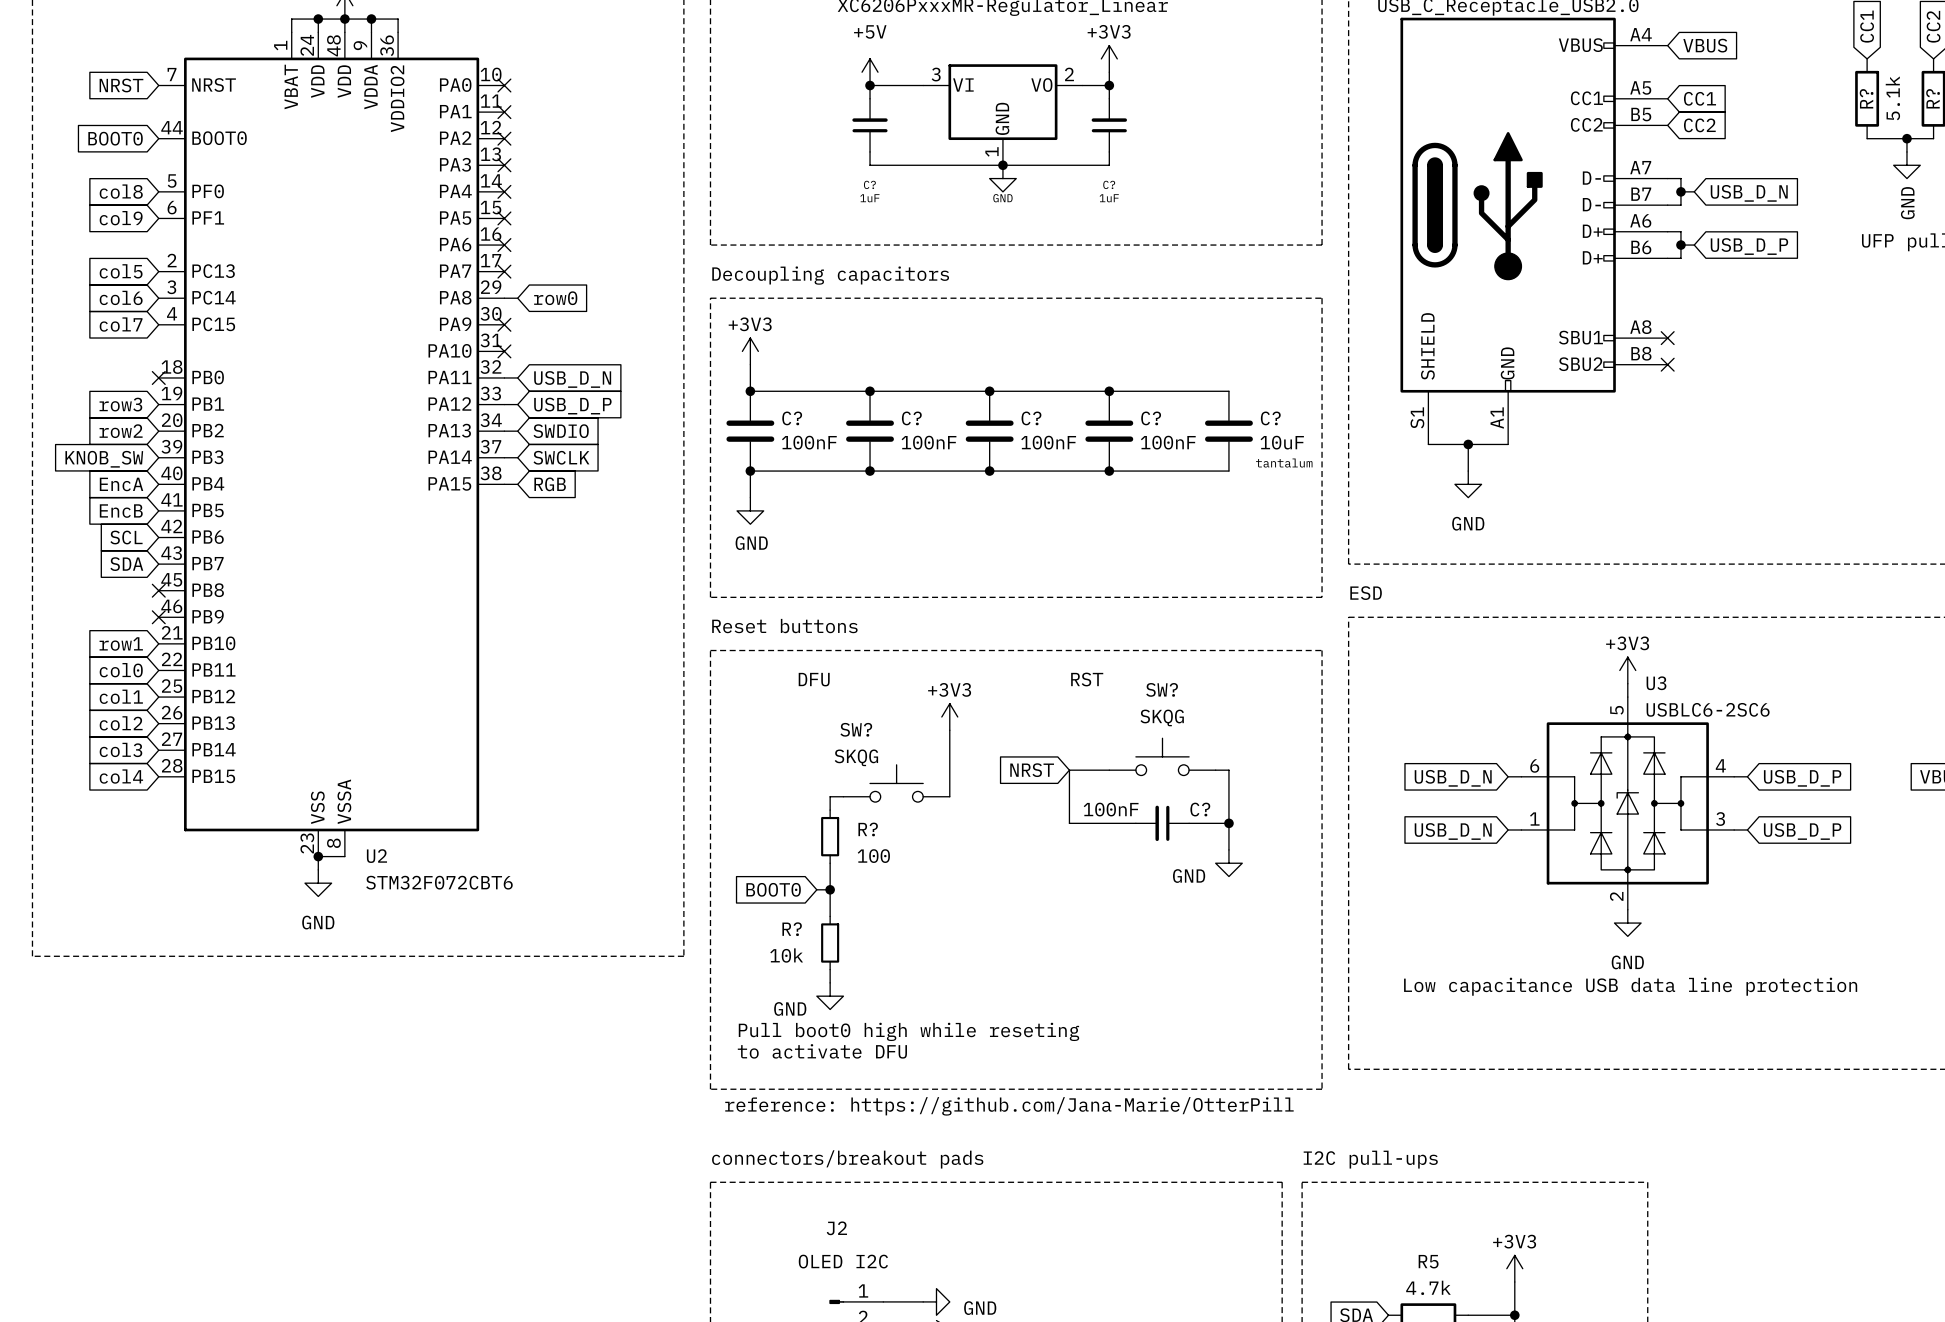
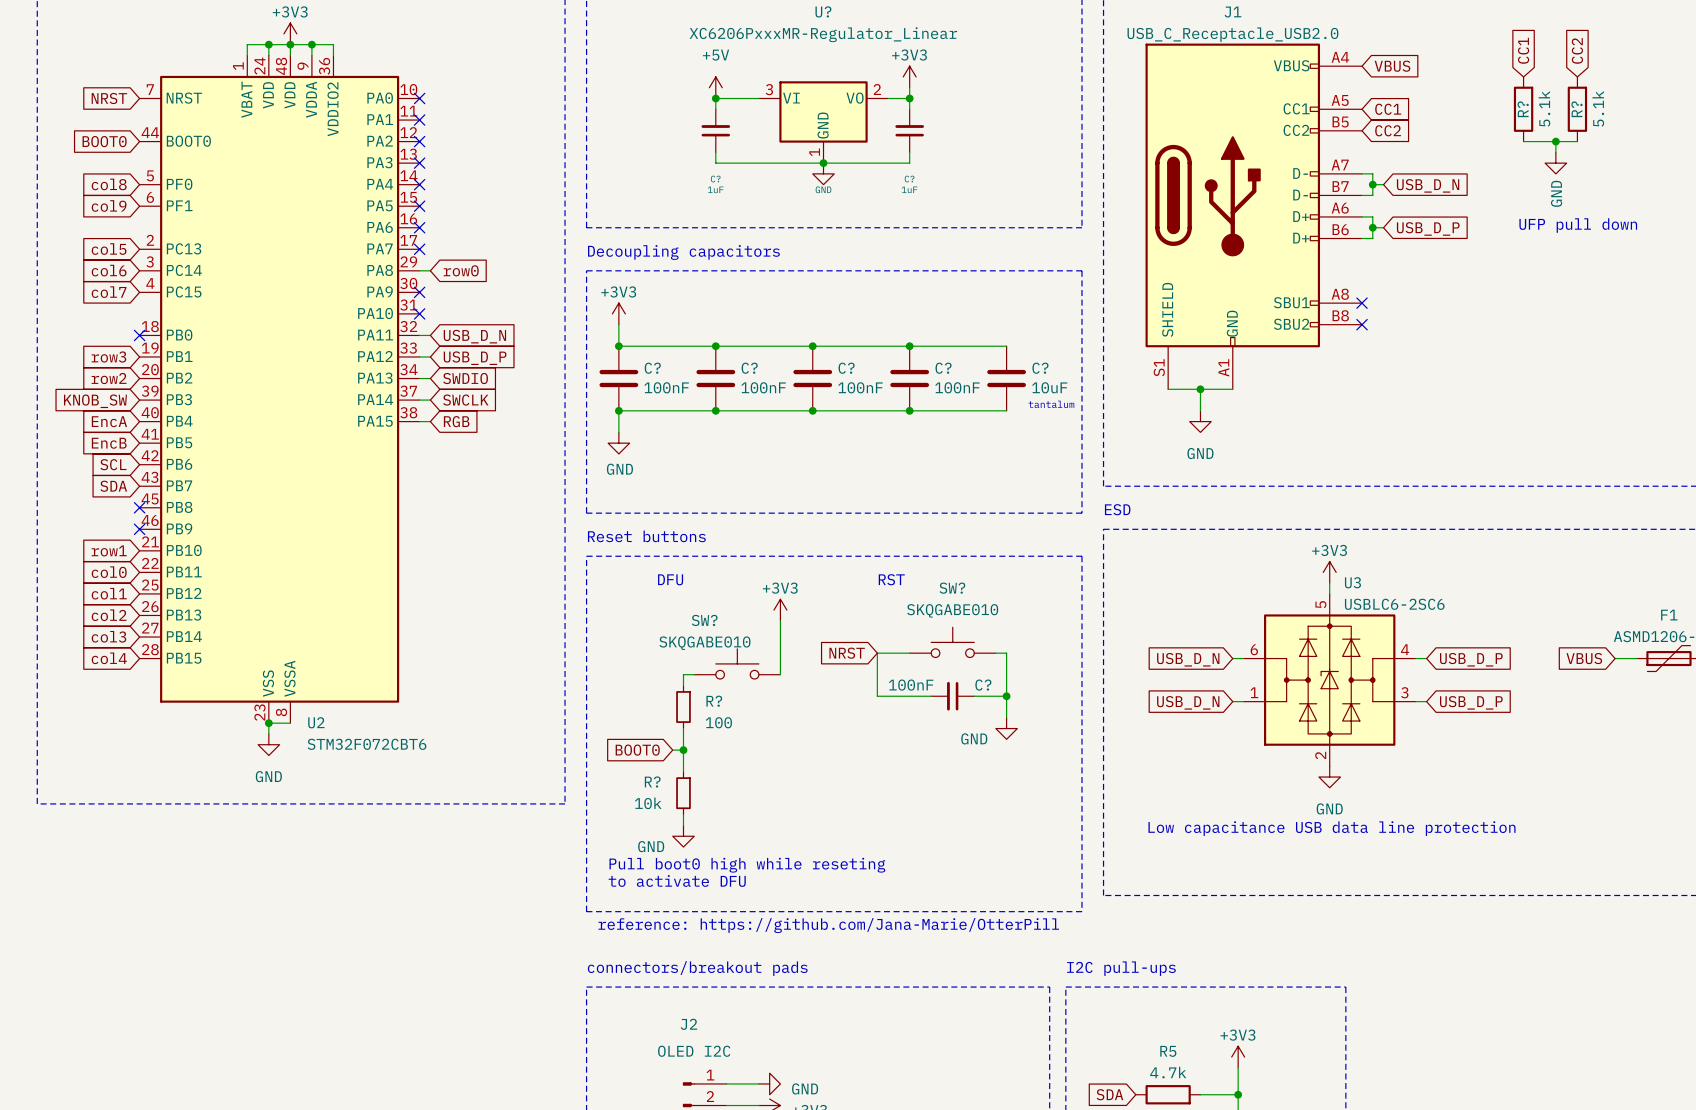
SW? value: SKQG (1162, 717) -> SKQGABE010 (952, 610)
SW? value: SKQG (856, 757) -> SKQGABE010 (704, 643)

